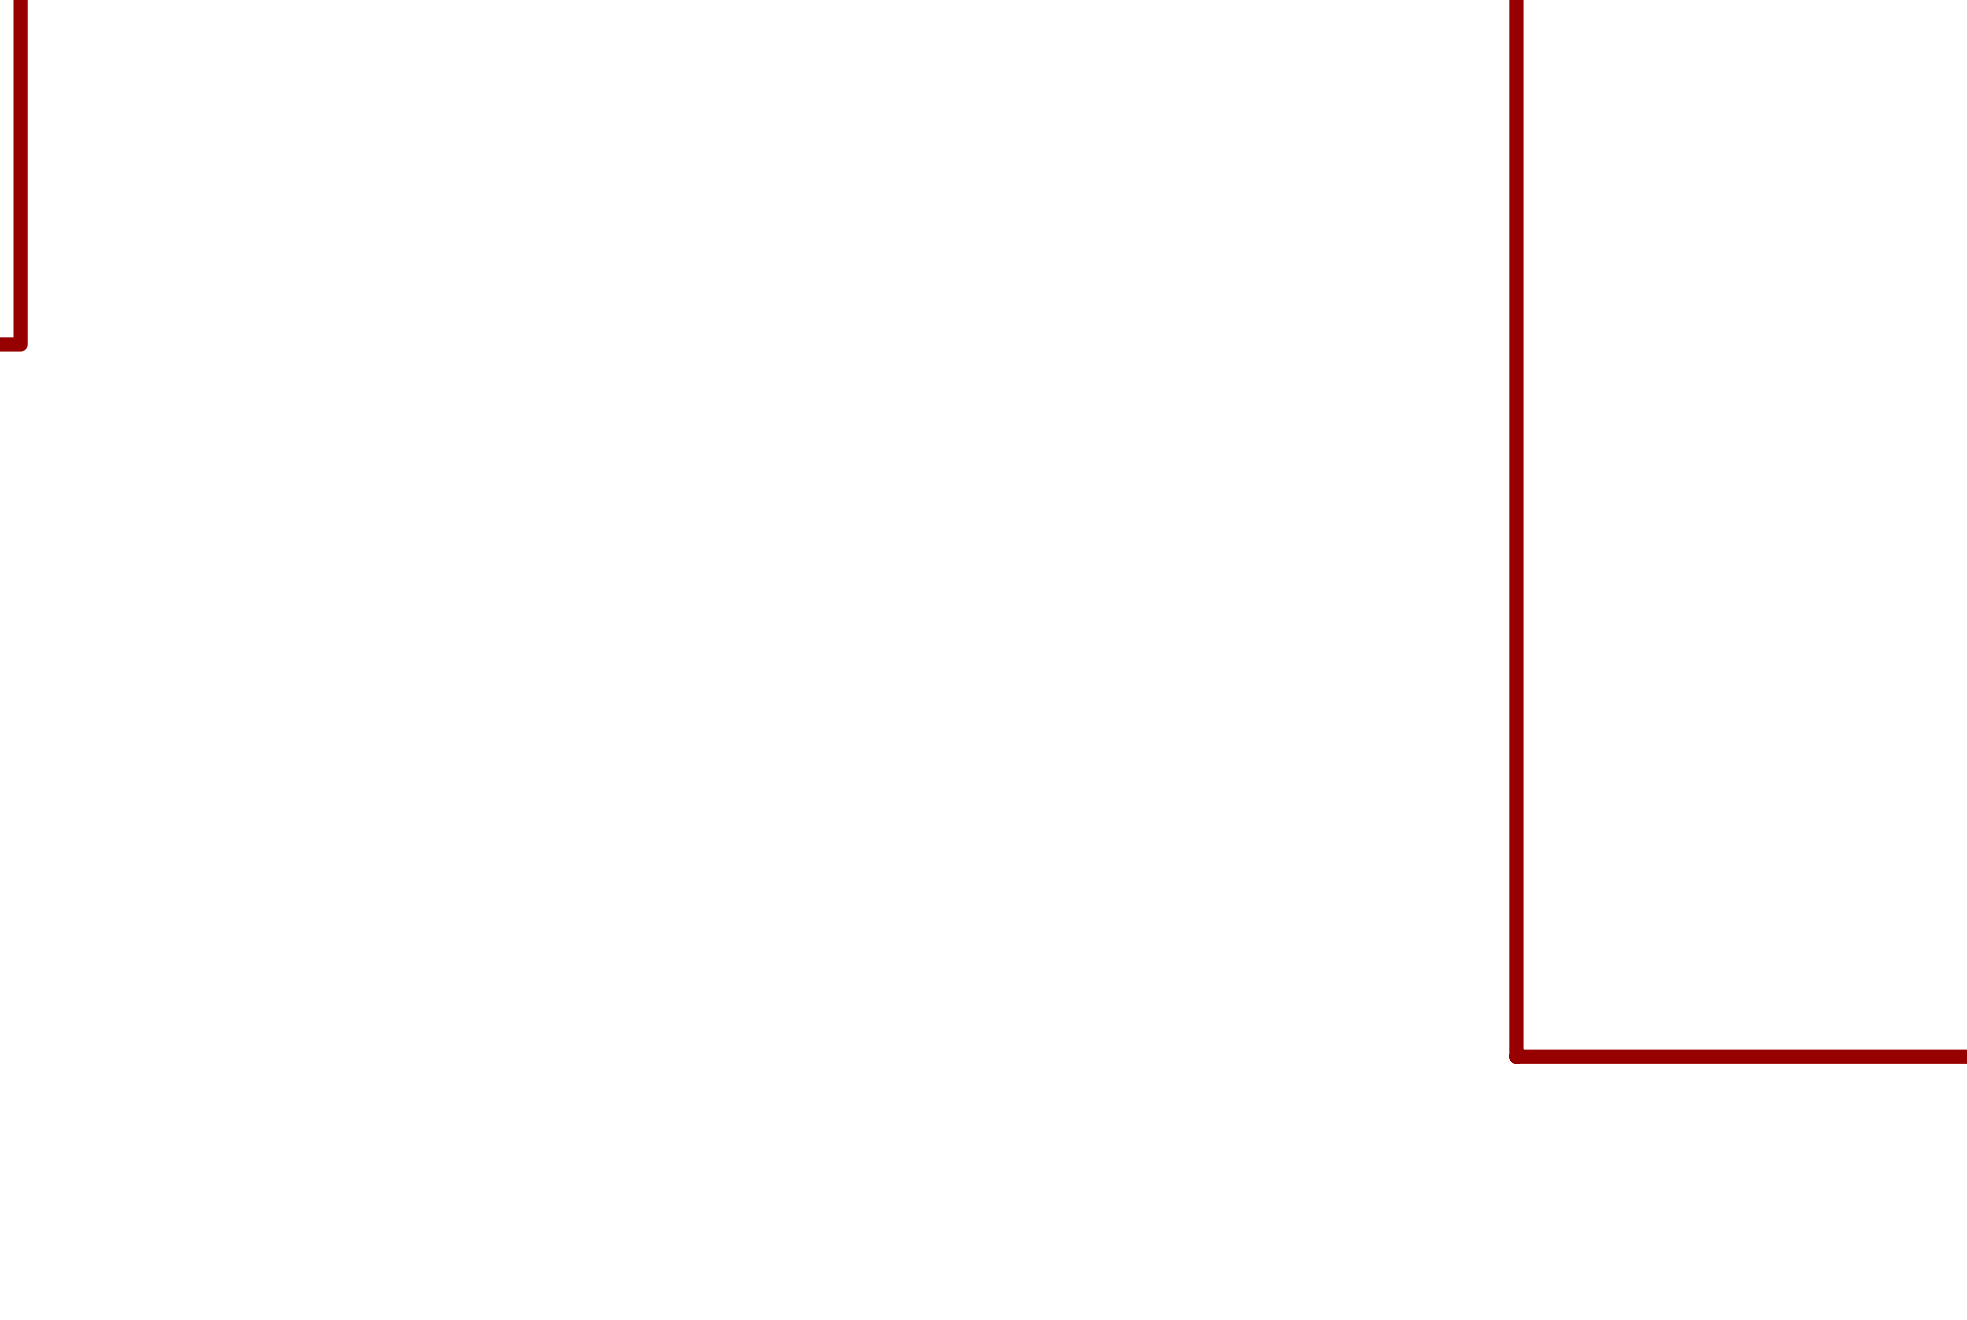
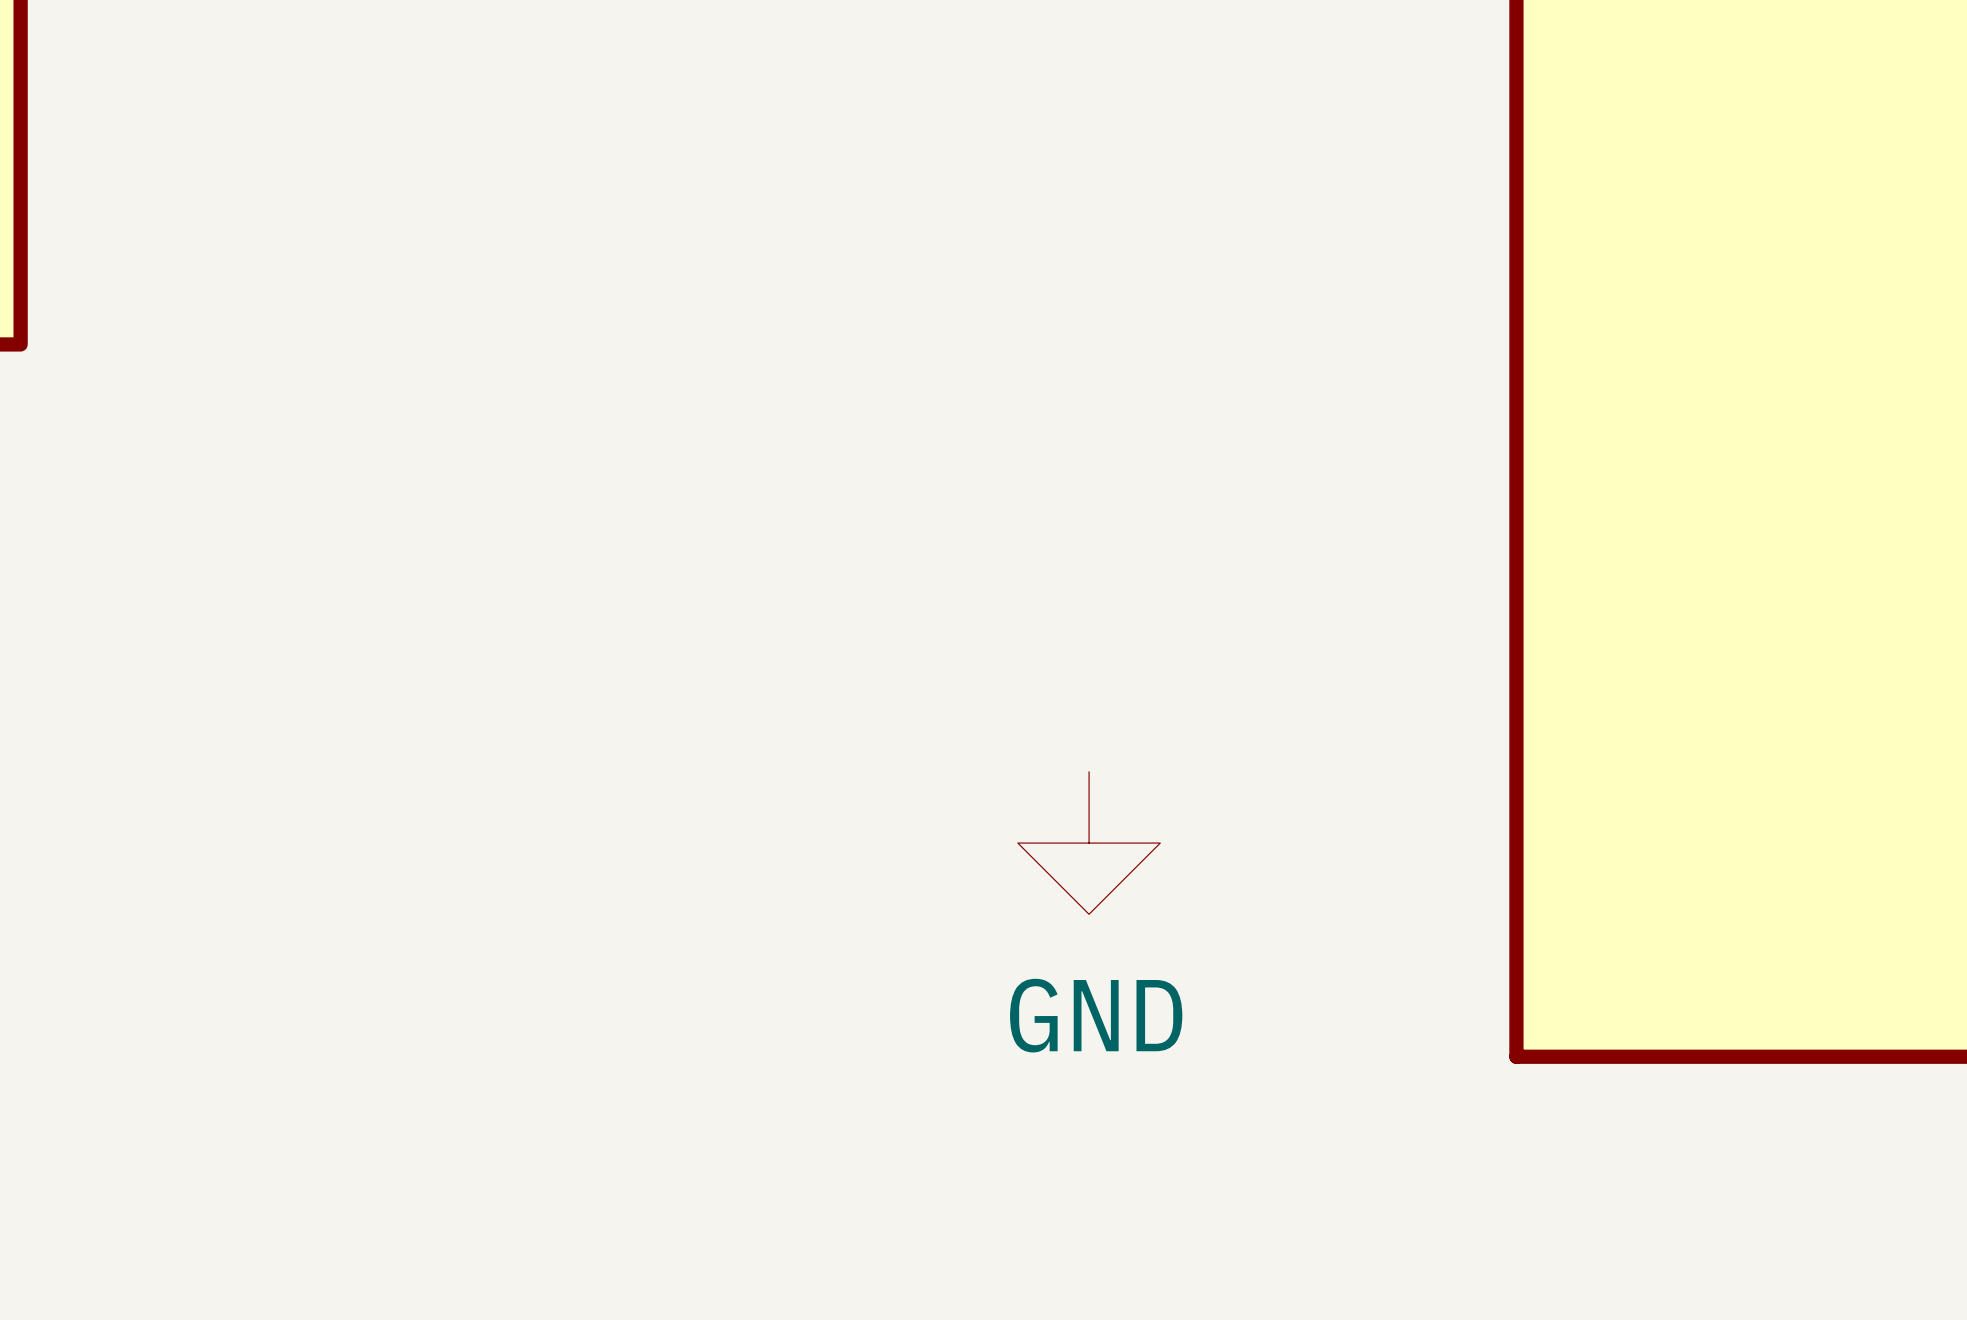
power symbol: none -> GND (1089, 843)

